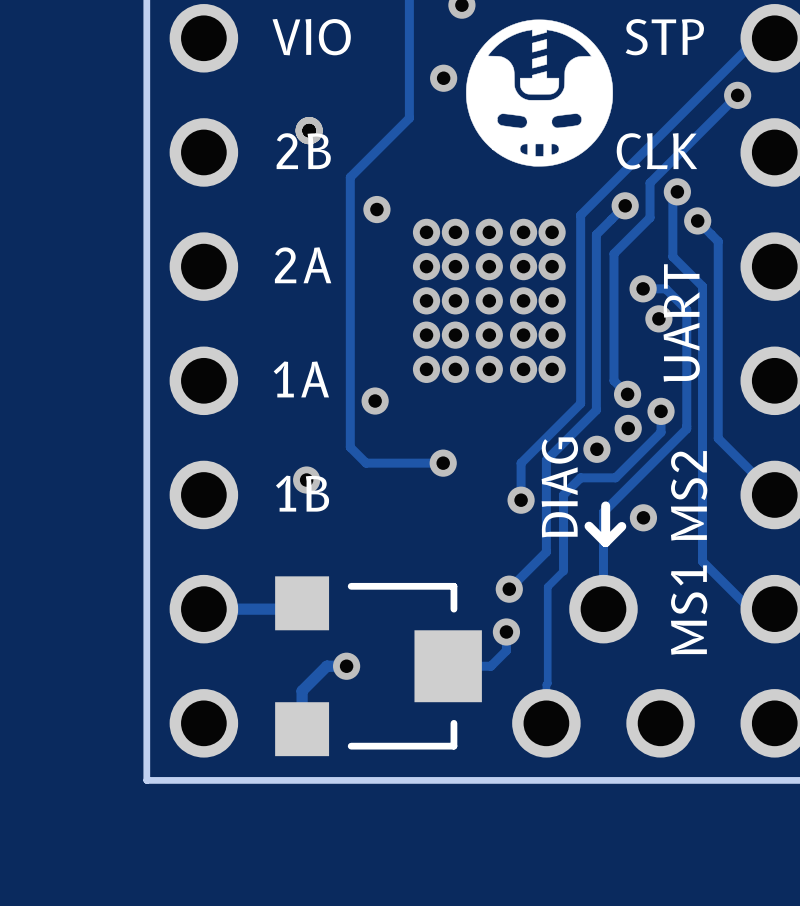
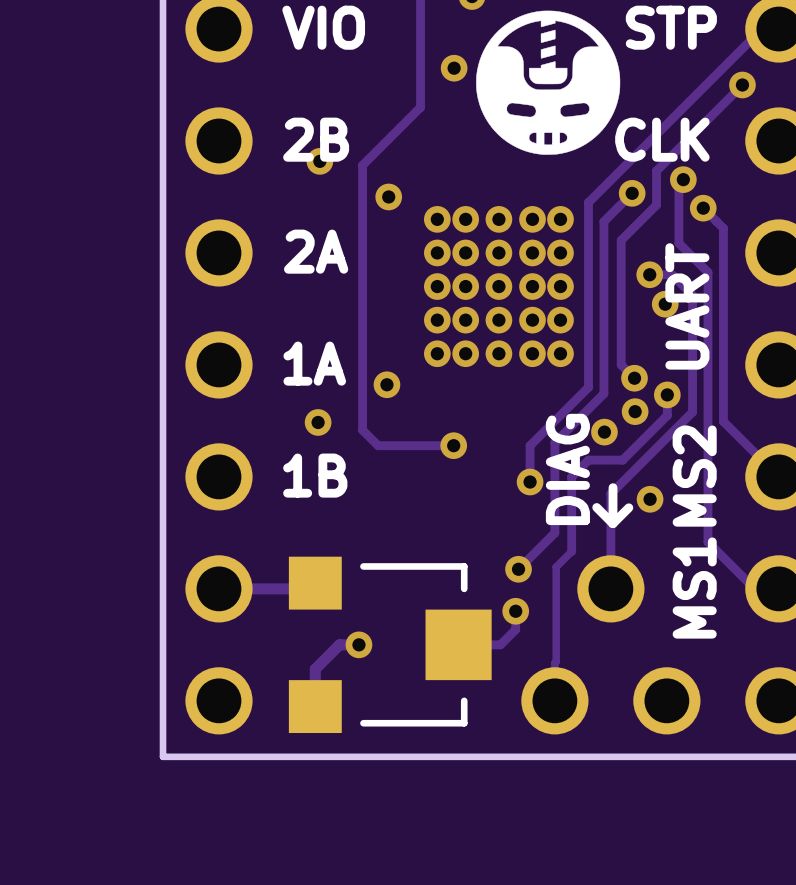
via position: (309, 130) -> (319, 161)
via position: (306, 480) -> (318, 422)

